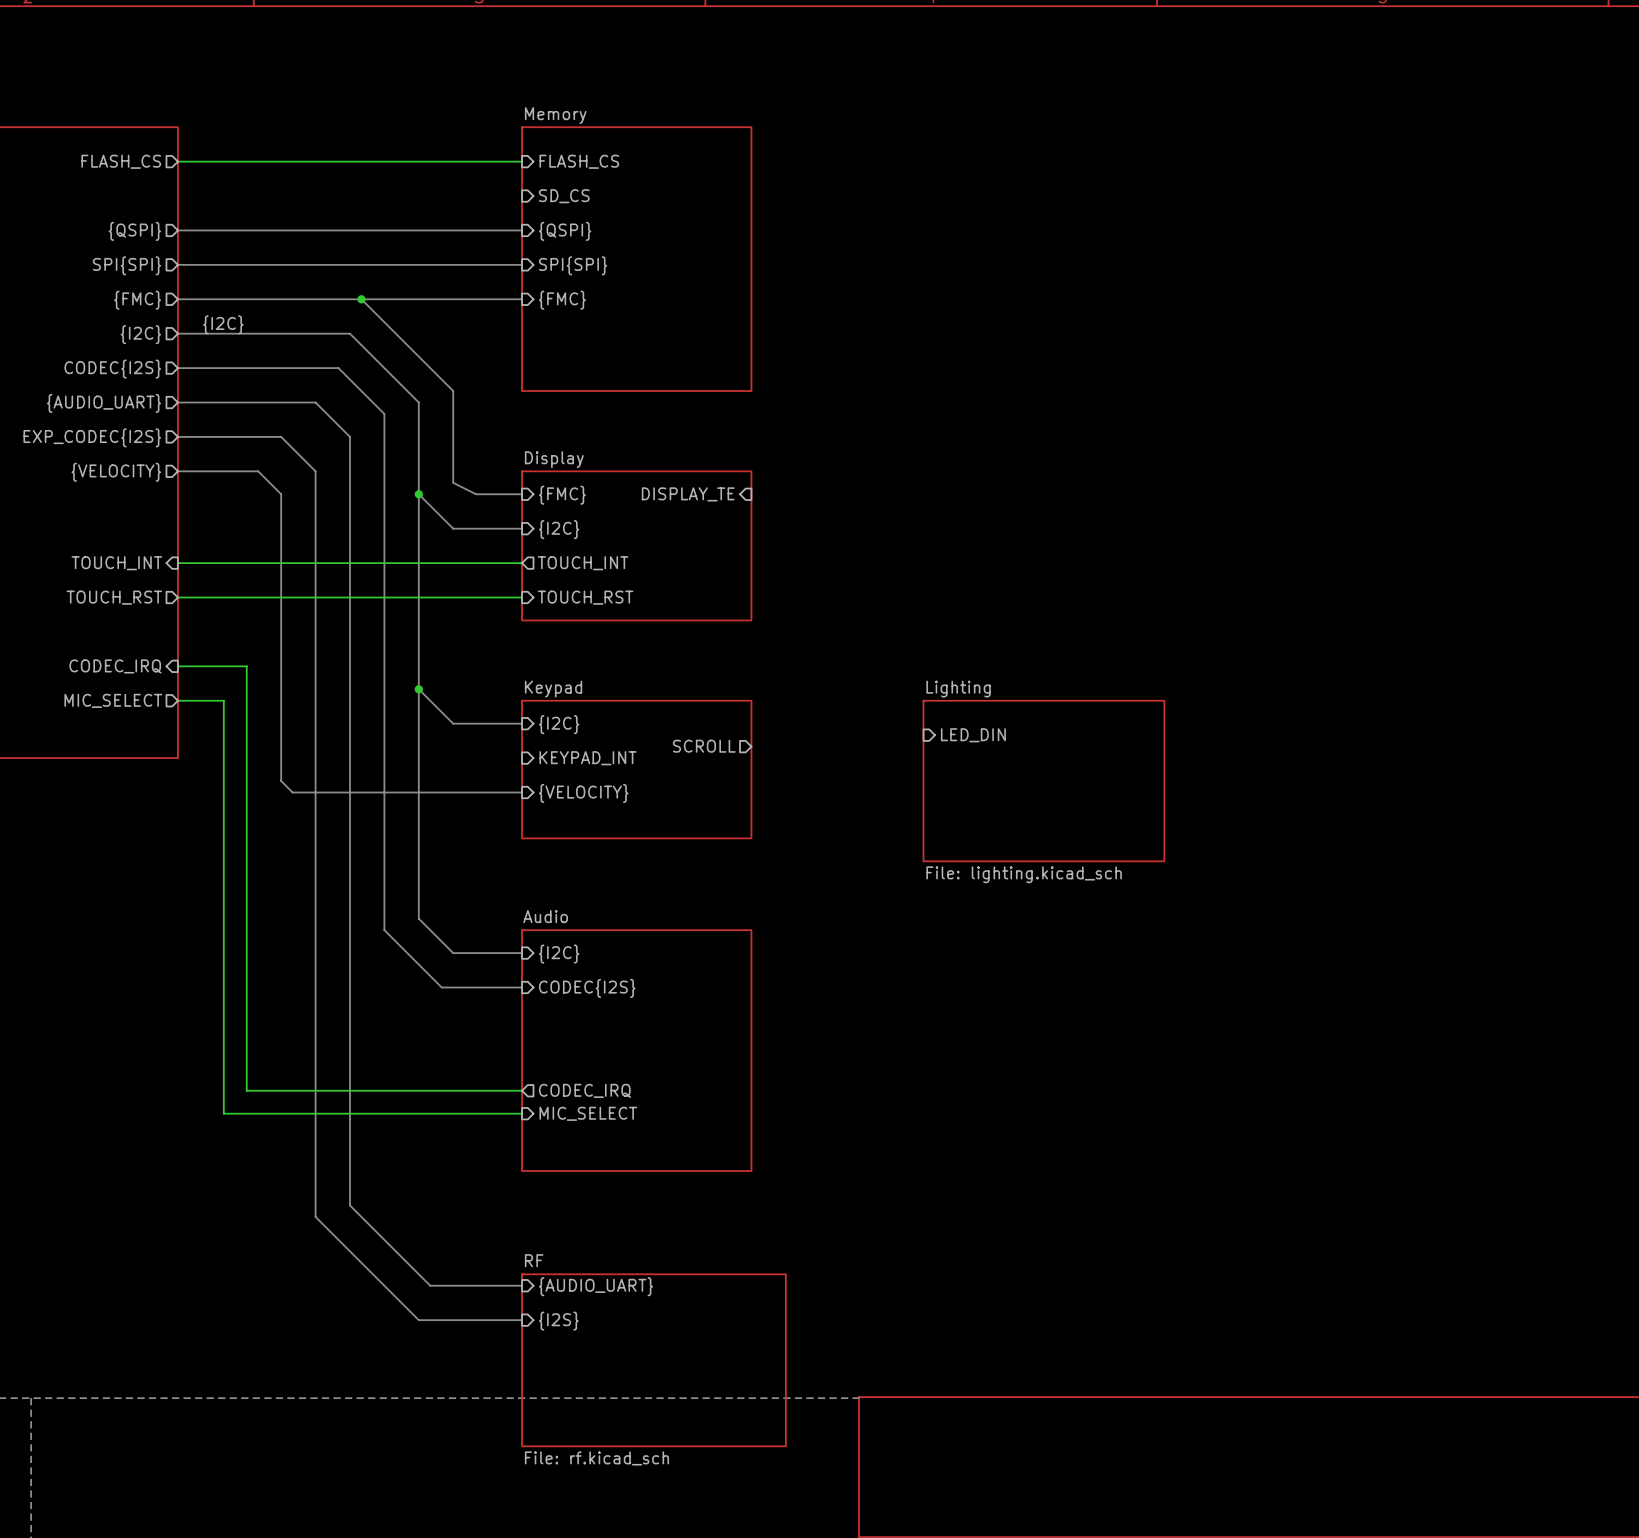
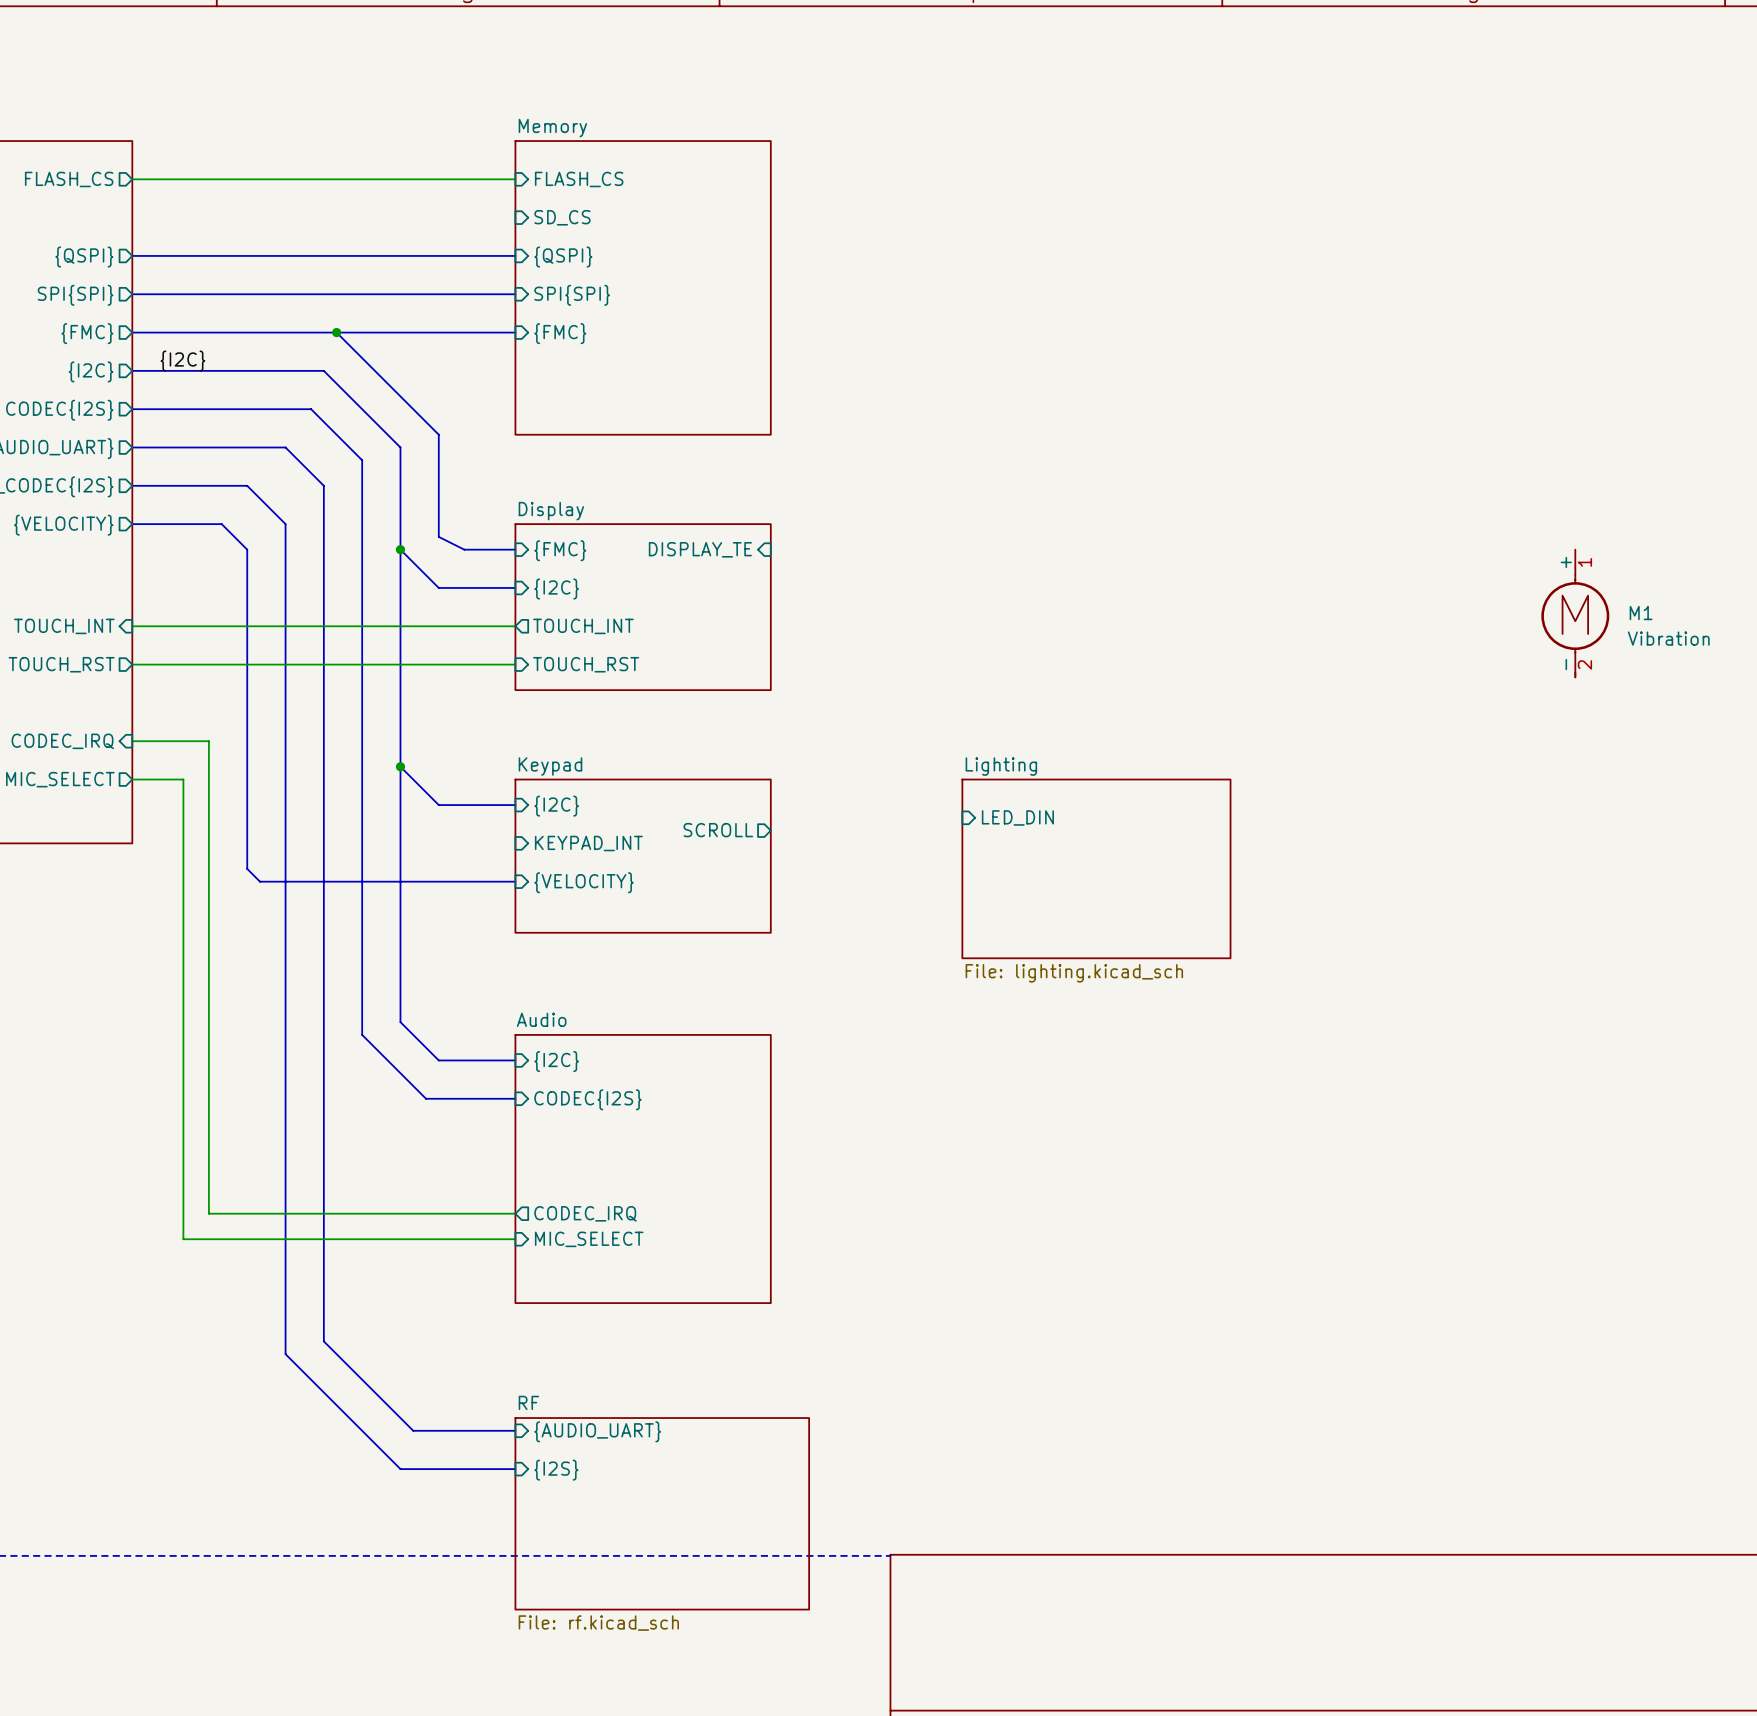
M1: none -> Vibration (1575, 613)

